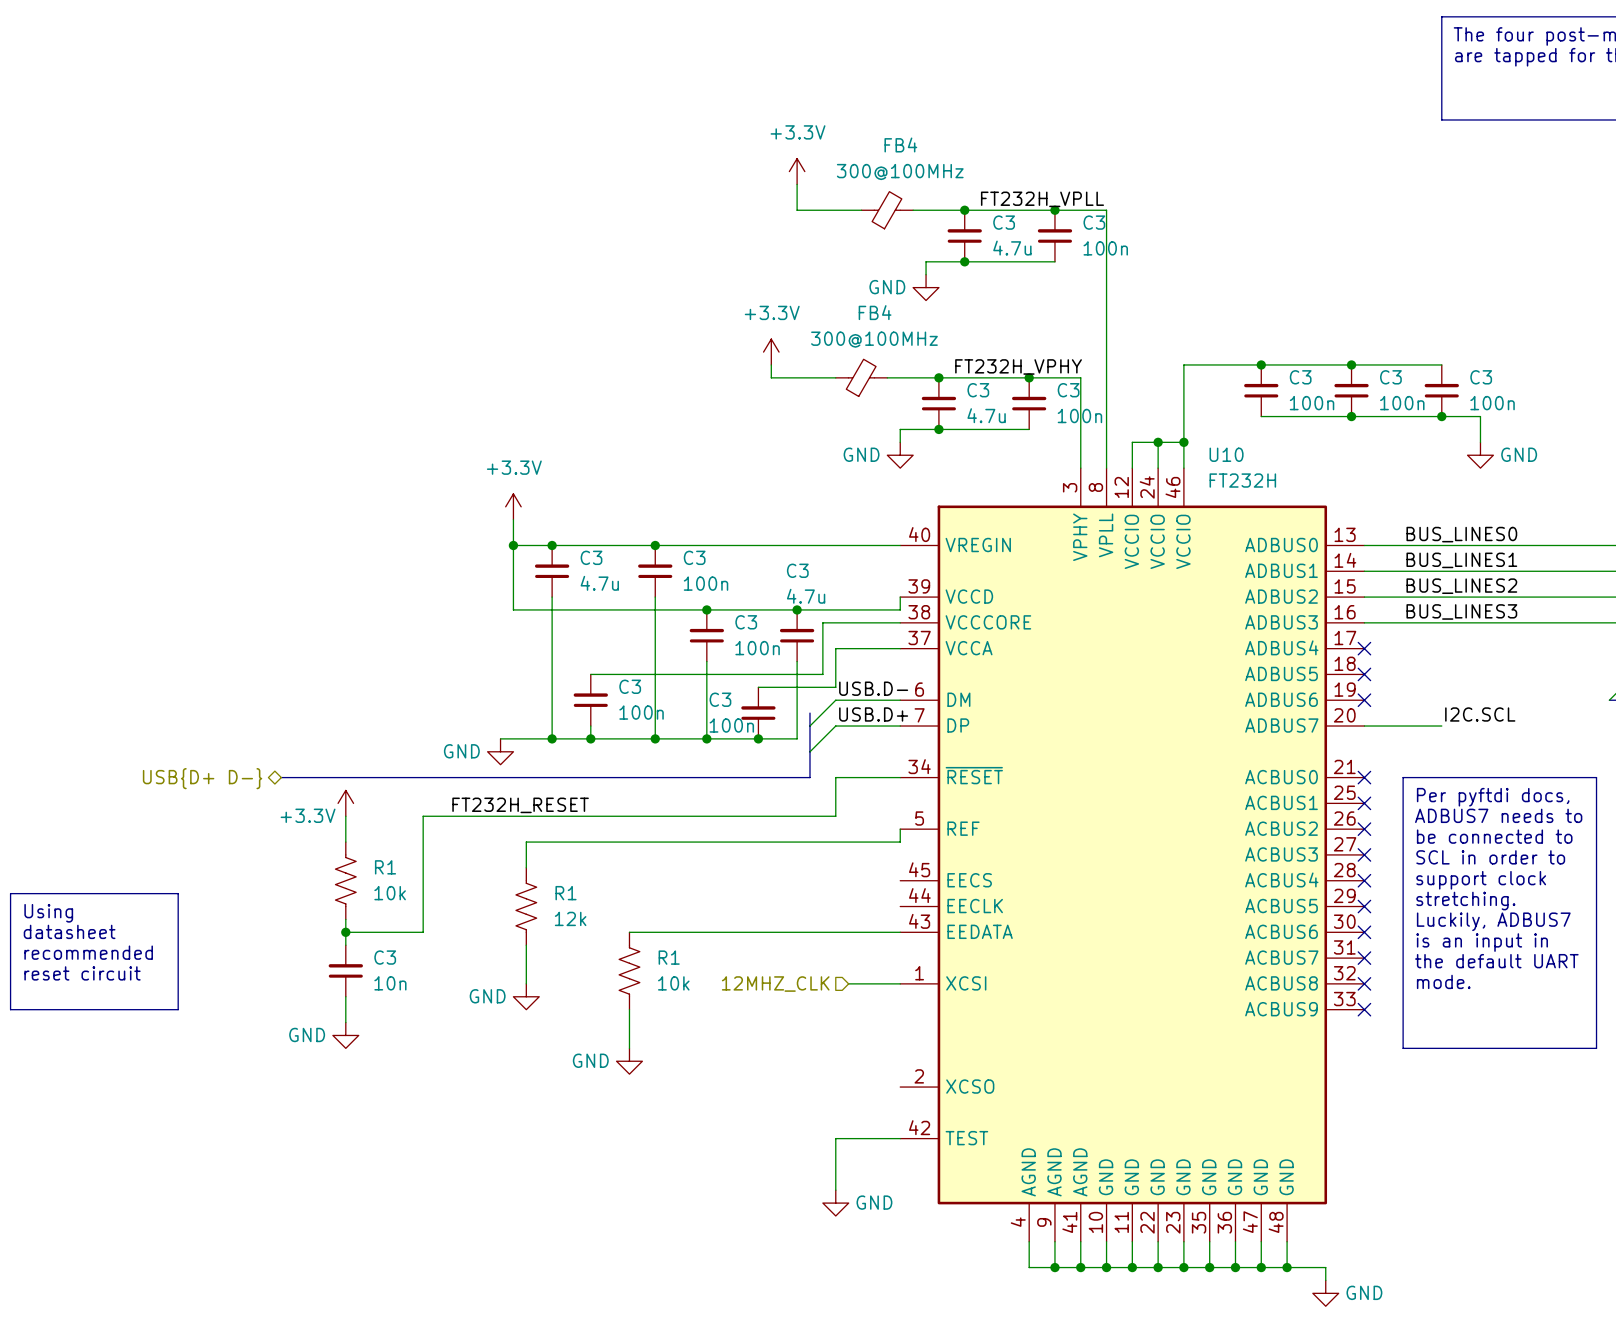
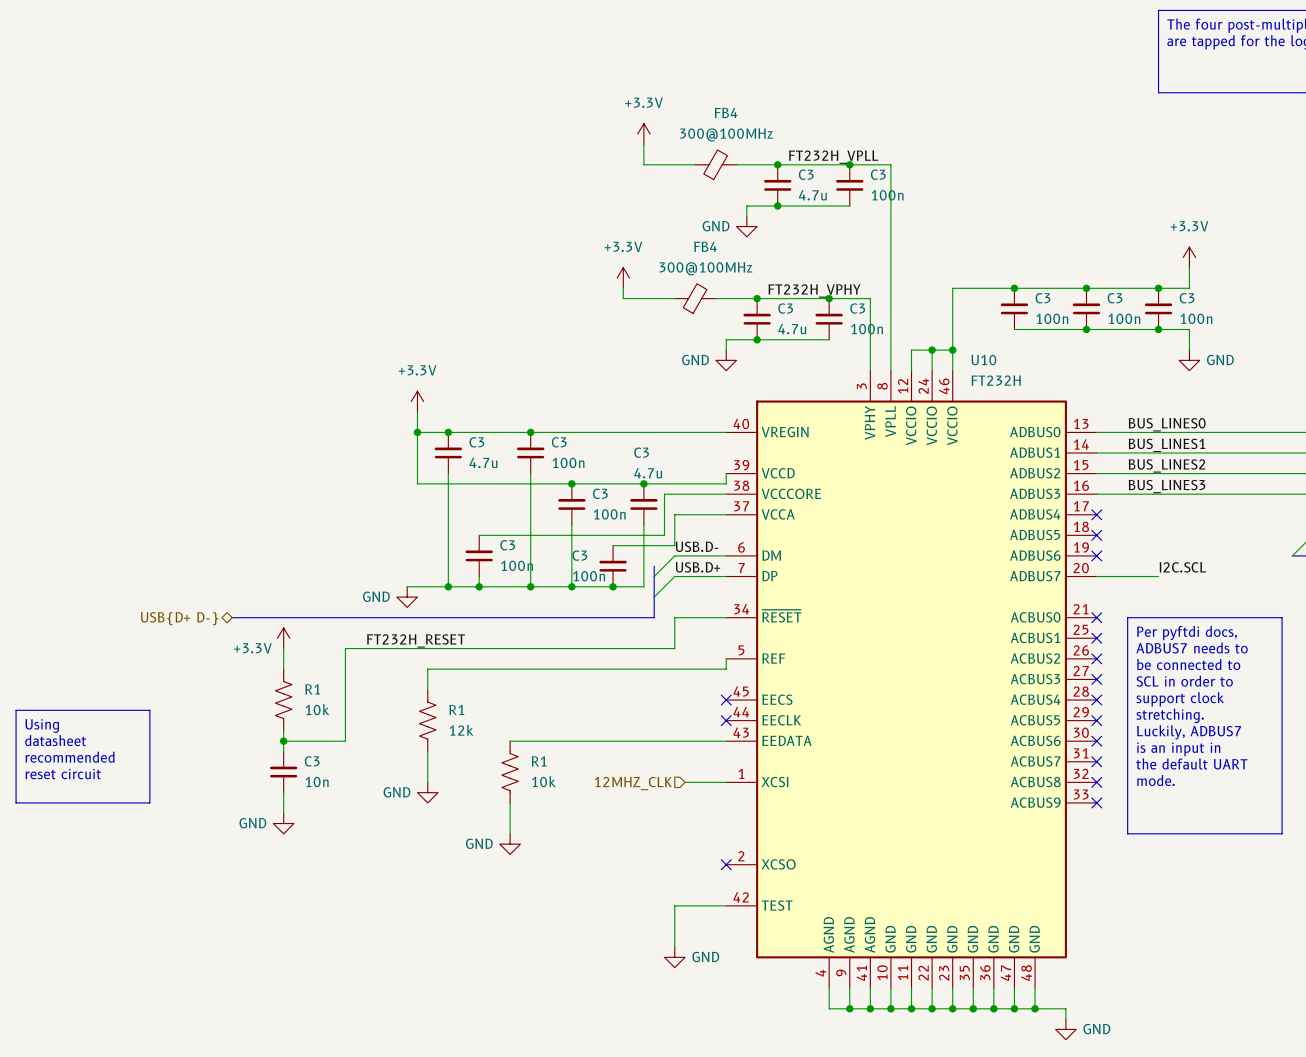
power symbol: none -> +3.3V (1189, 257)
wire: none -> (1189, 267) (1189, 288) (1158, 288)
junction: none -> (1158, 288)
no-connect mark: none -> (726, 700)
no-connect mark: none -> (726, 720)
no-connect mark: none -> (726, 864)

